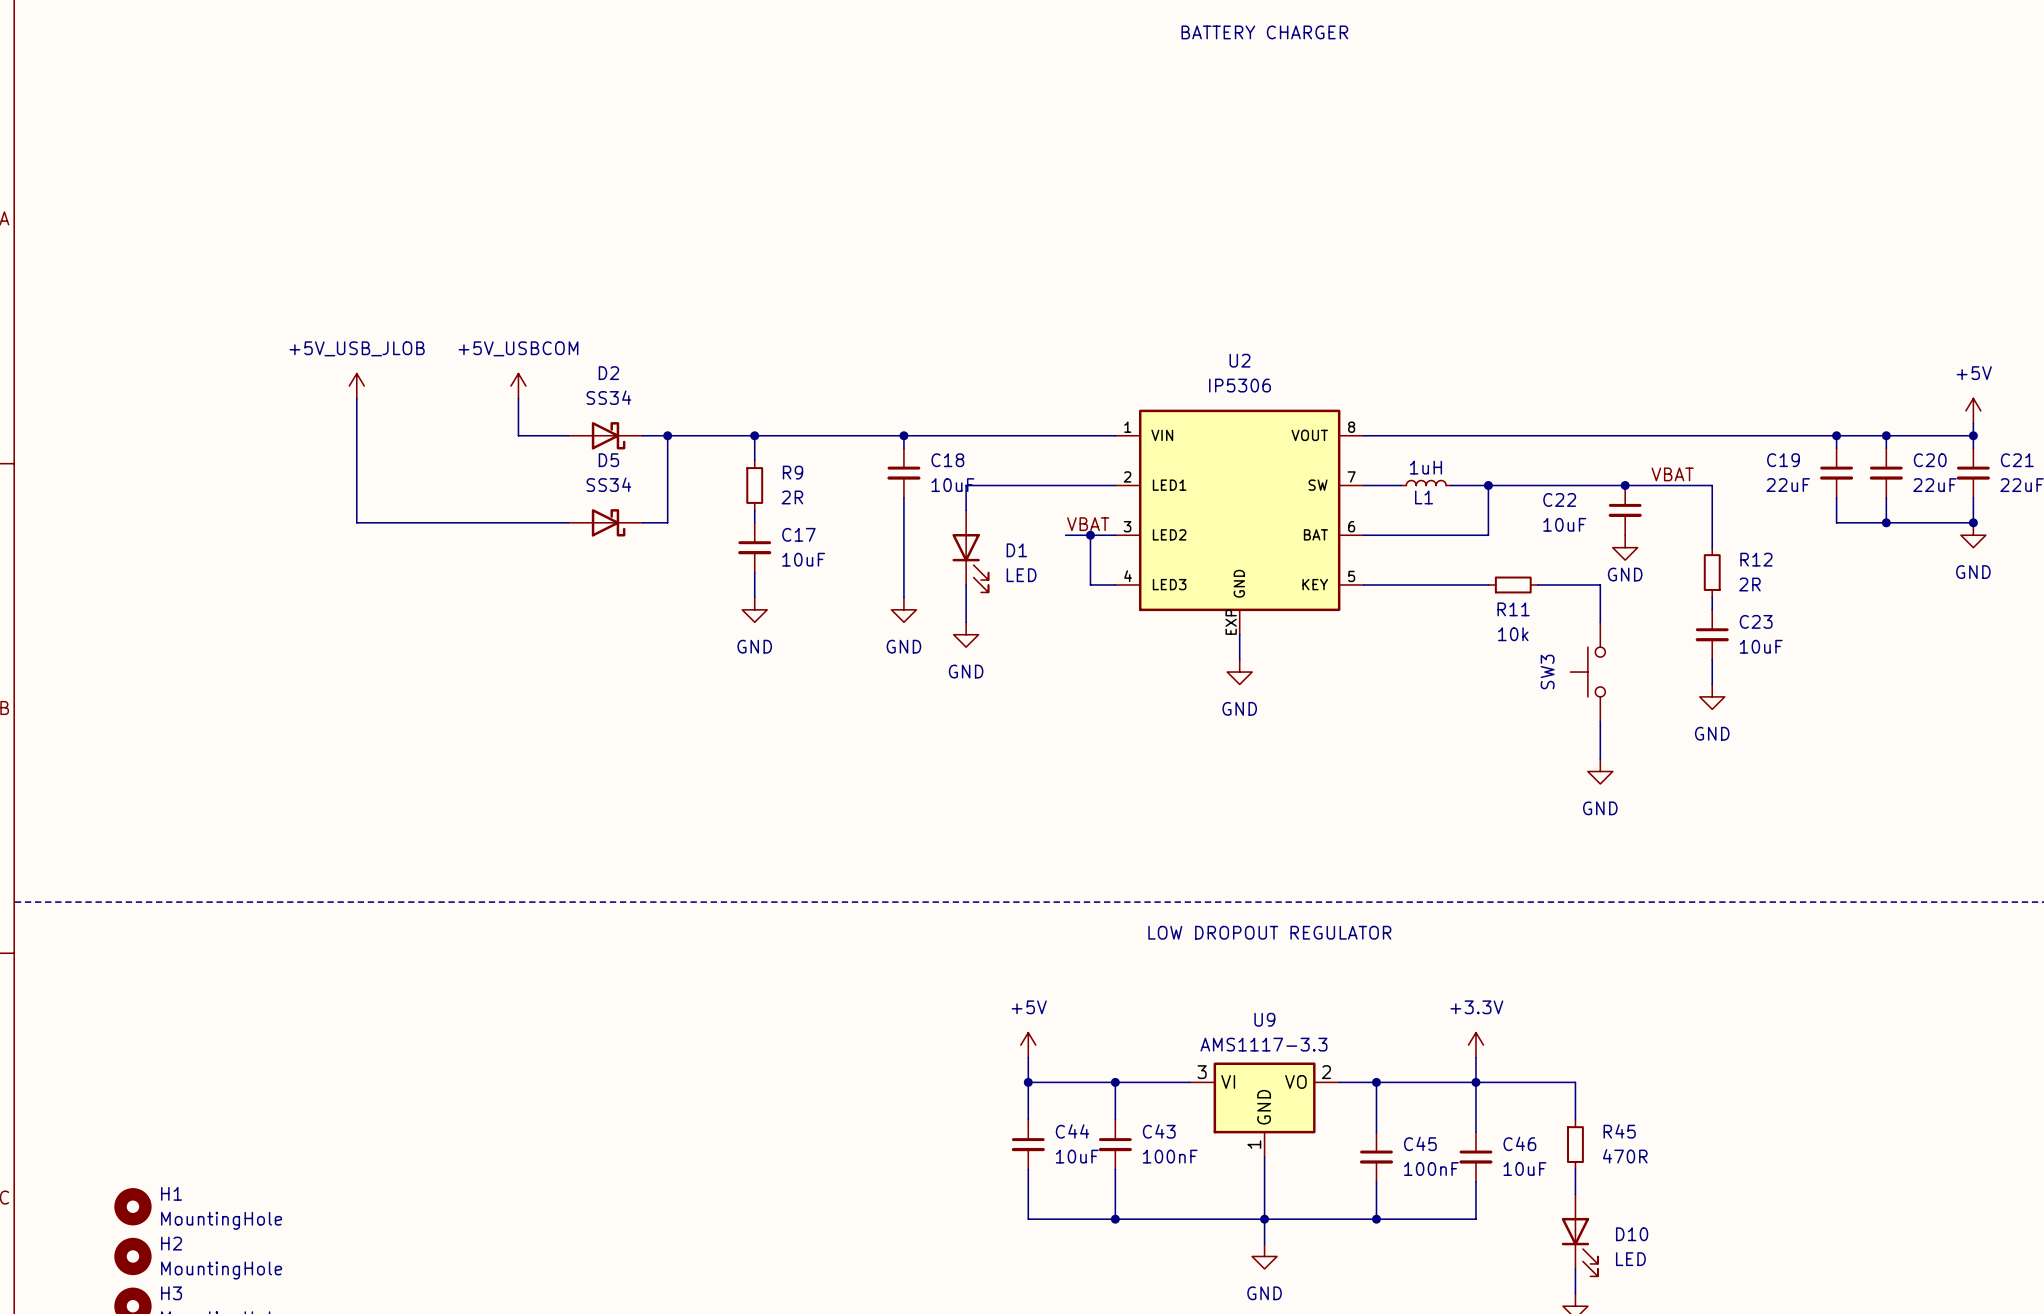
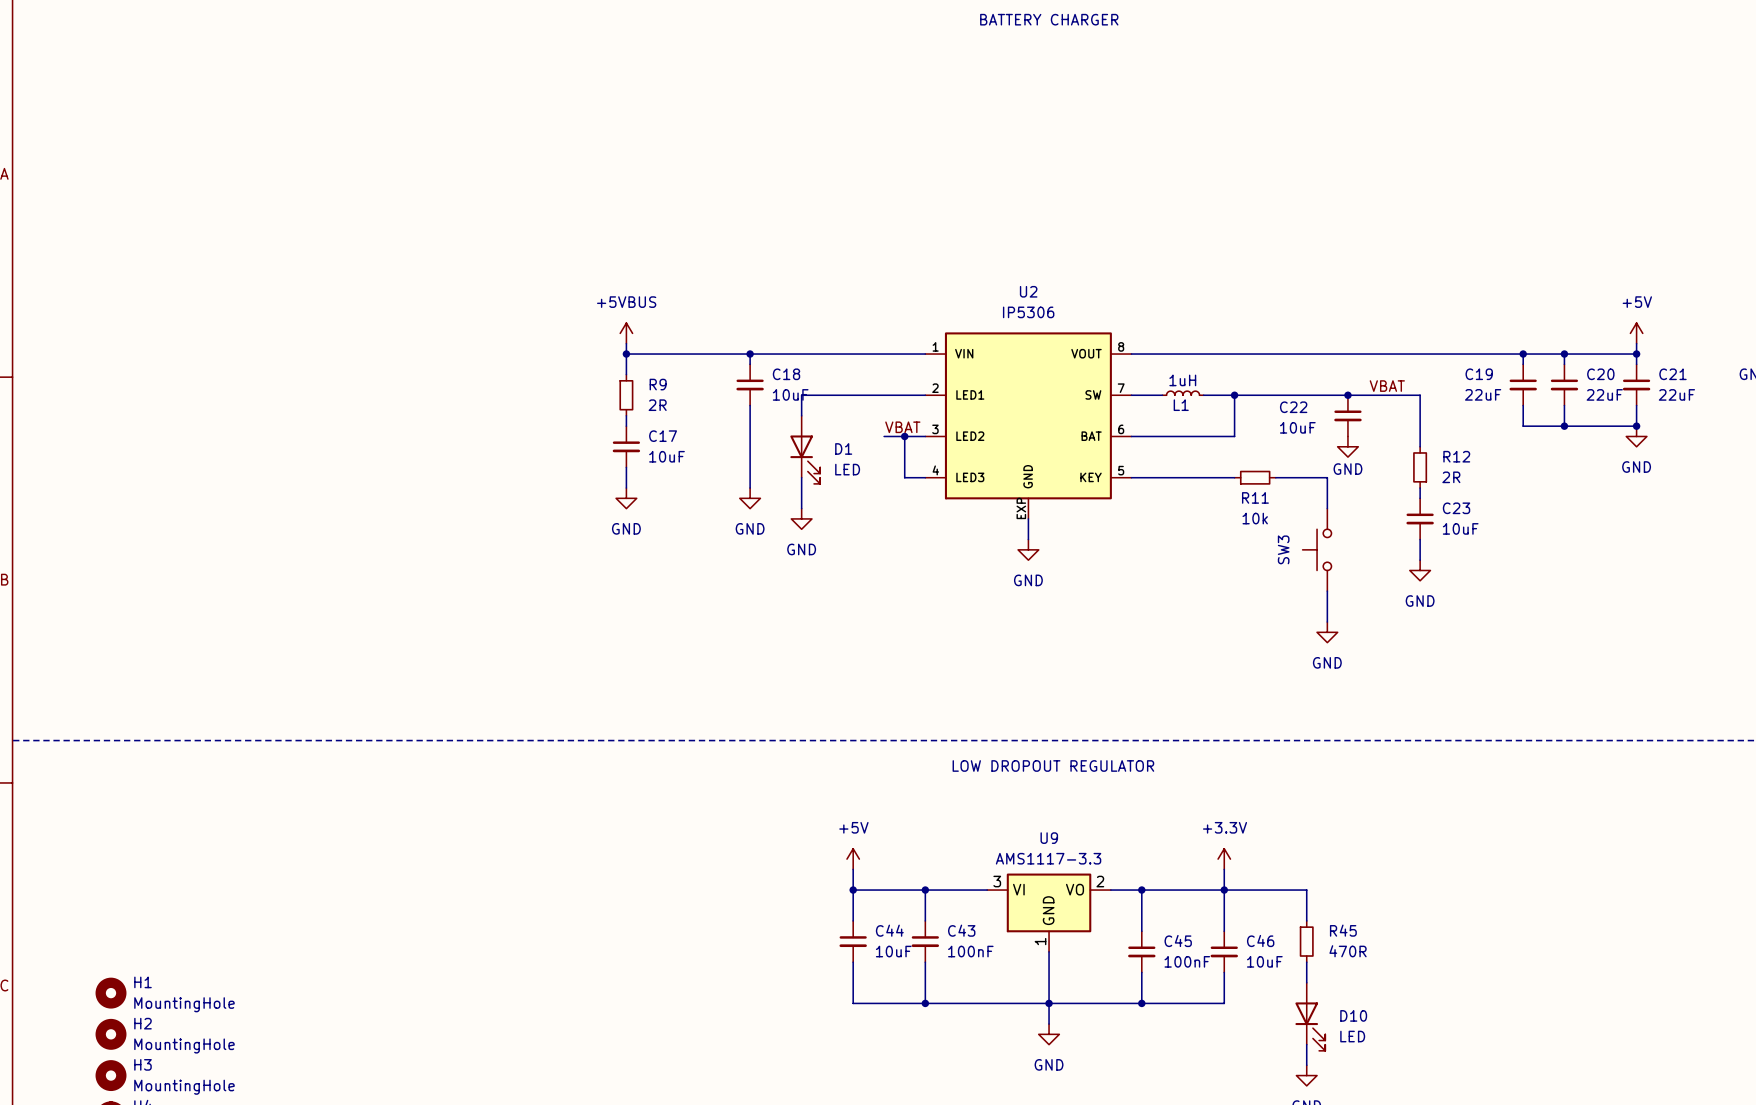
power symbol: +5V_USB_JLOB (356, 386) -> none
power symbol: +5V_USBCOM (518, 386) -> none
wire: (356, 398) (356, 522) (568, 522) -> none
wire: (518, 398) (518, 435) (568, 435) -> none
power symbol: none -> +5VBUS (626, 333)
D2: SS34 (605, 435) -> none
wire: (642, 435) (754, 435) -> (626, 343) (626, 354)
wire: (667, 435) (667, 522) (642, 522) -> none
junction: (667, 435) -> none
D5: SS34 (605, 522) -> none

